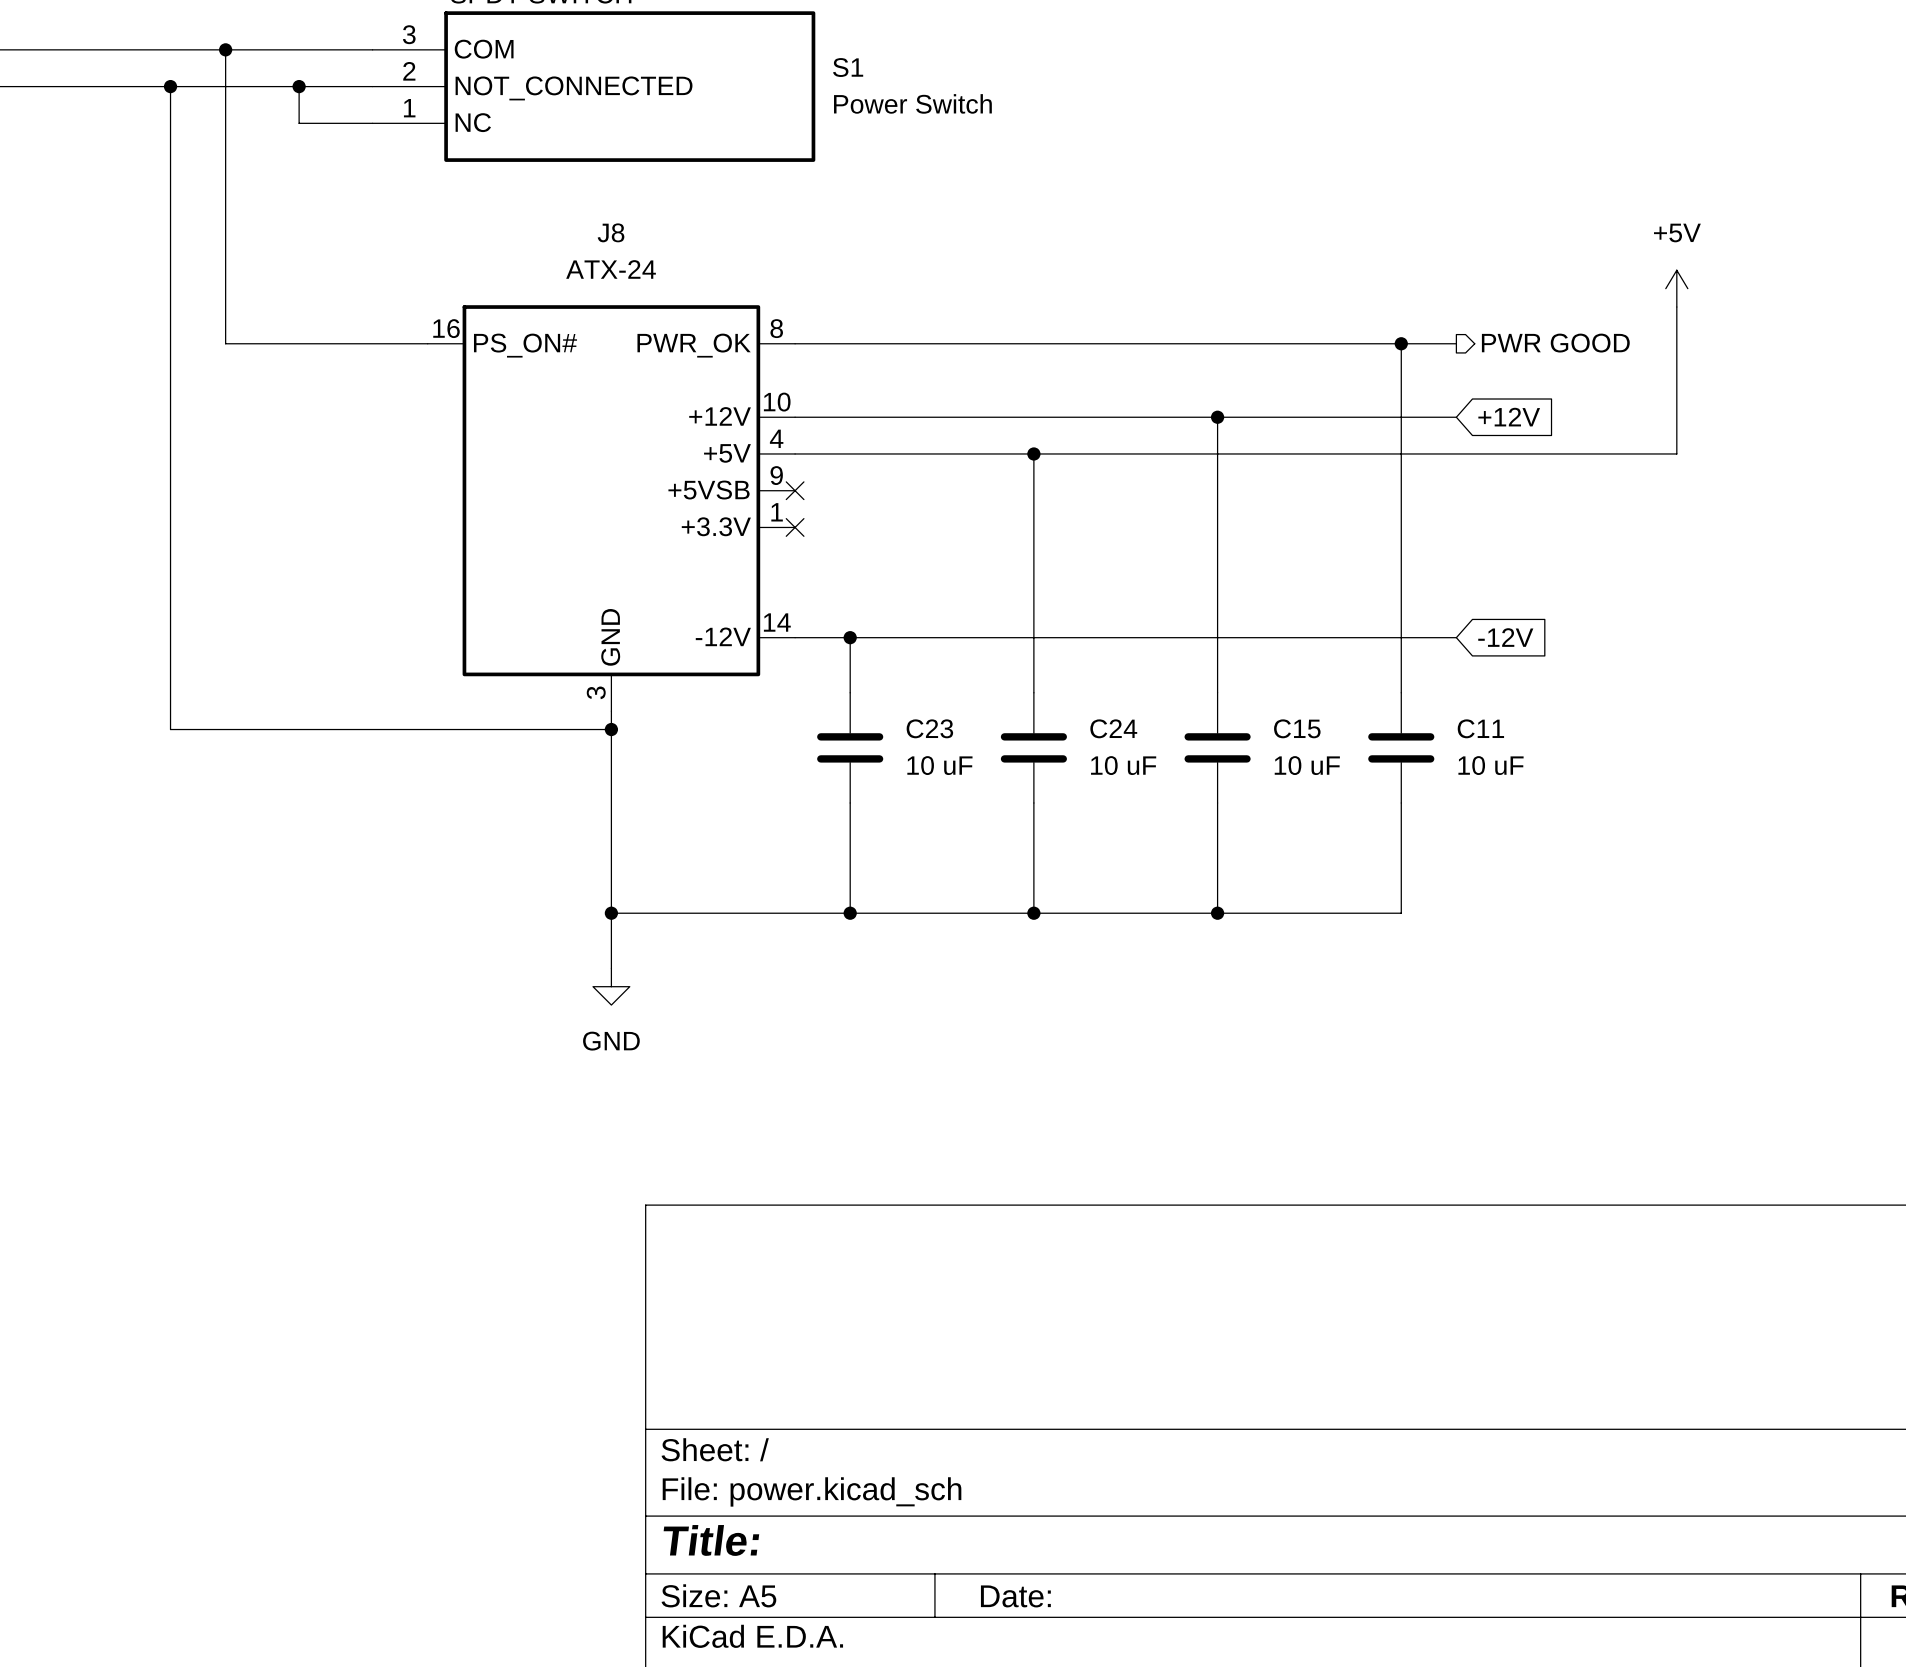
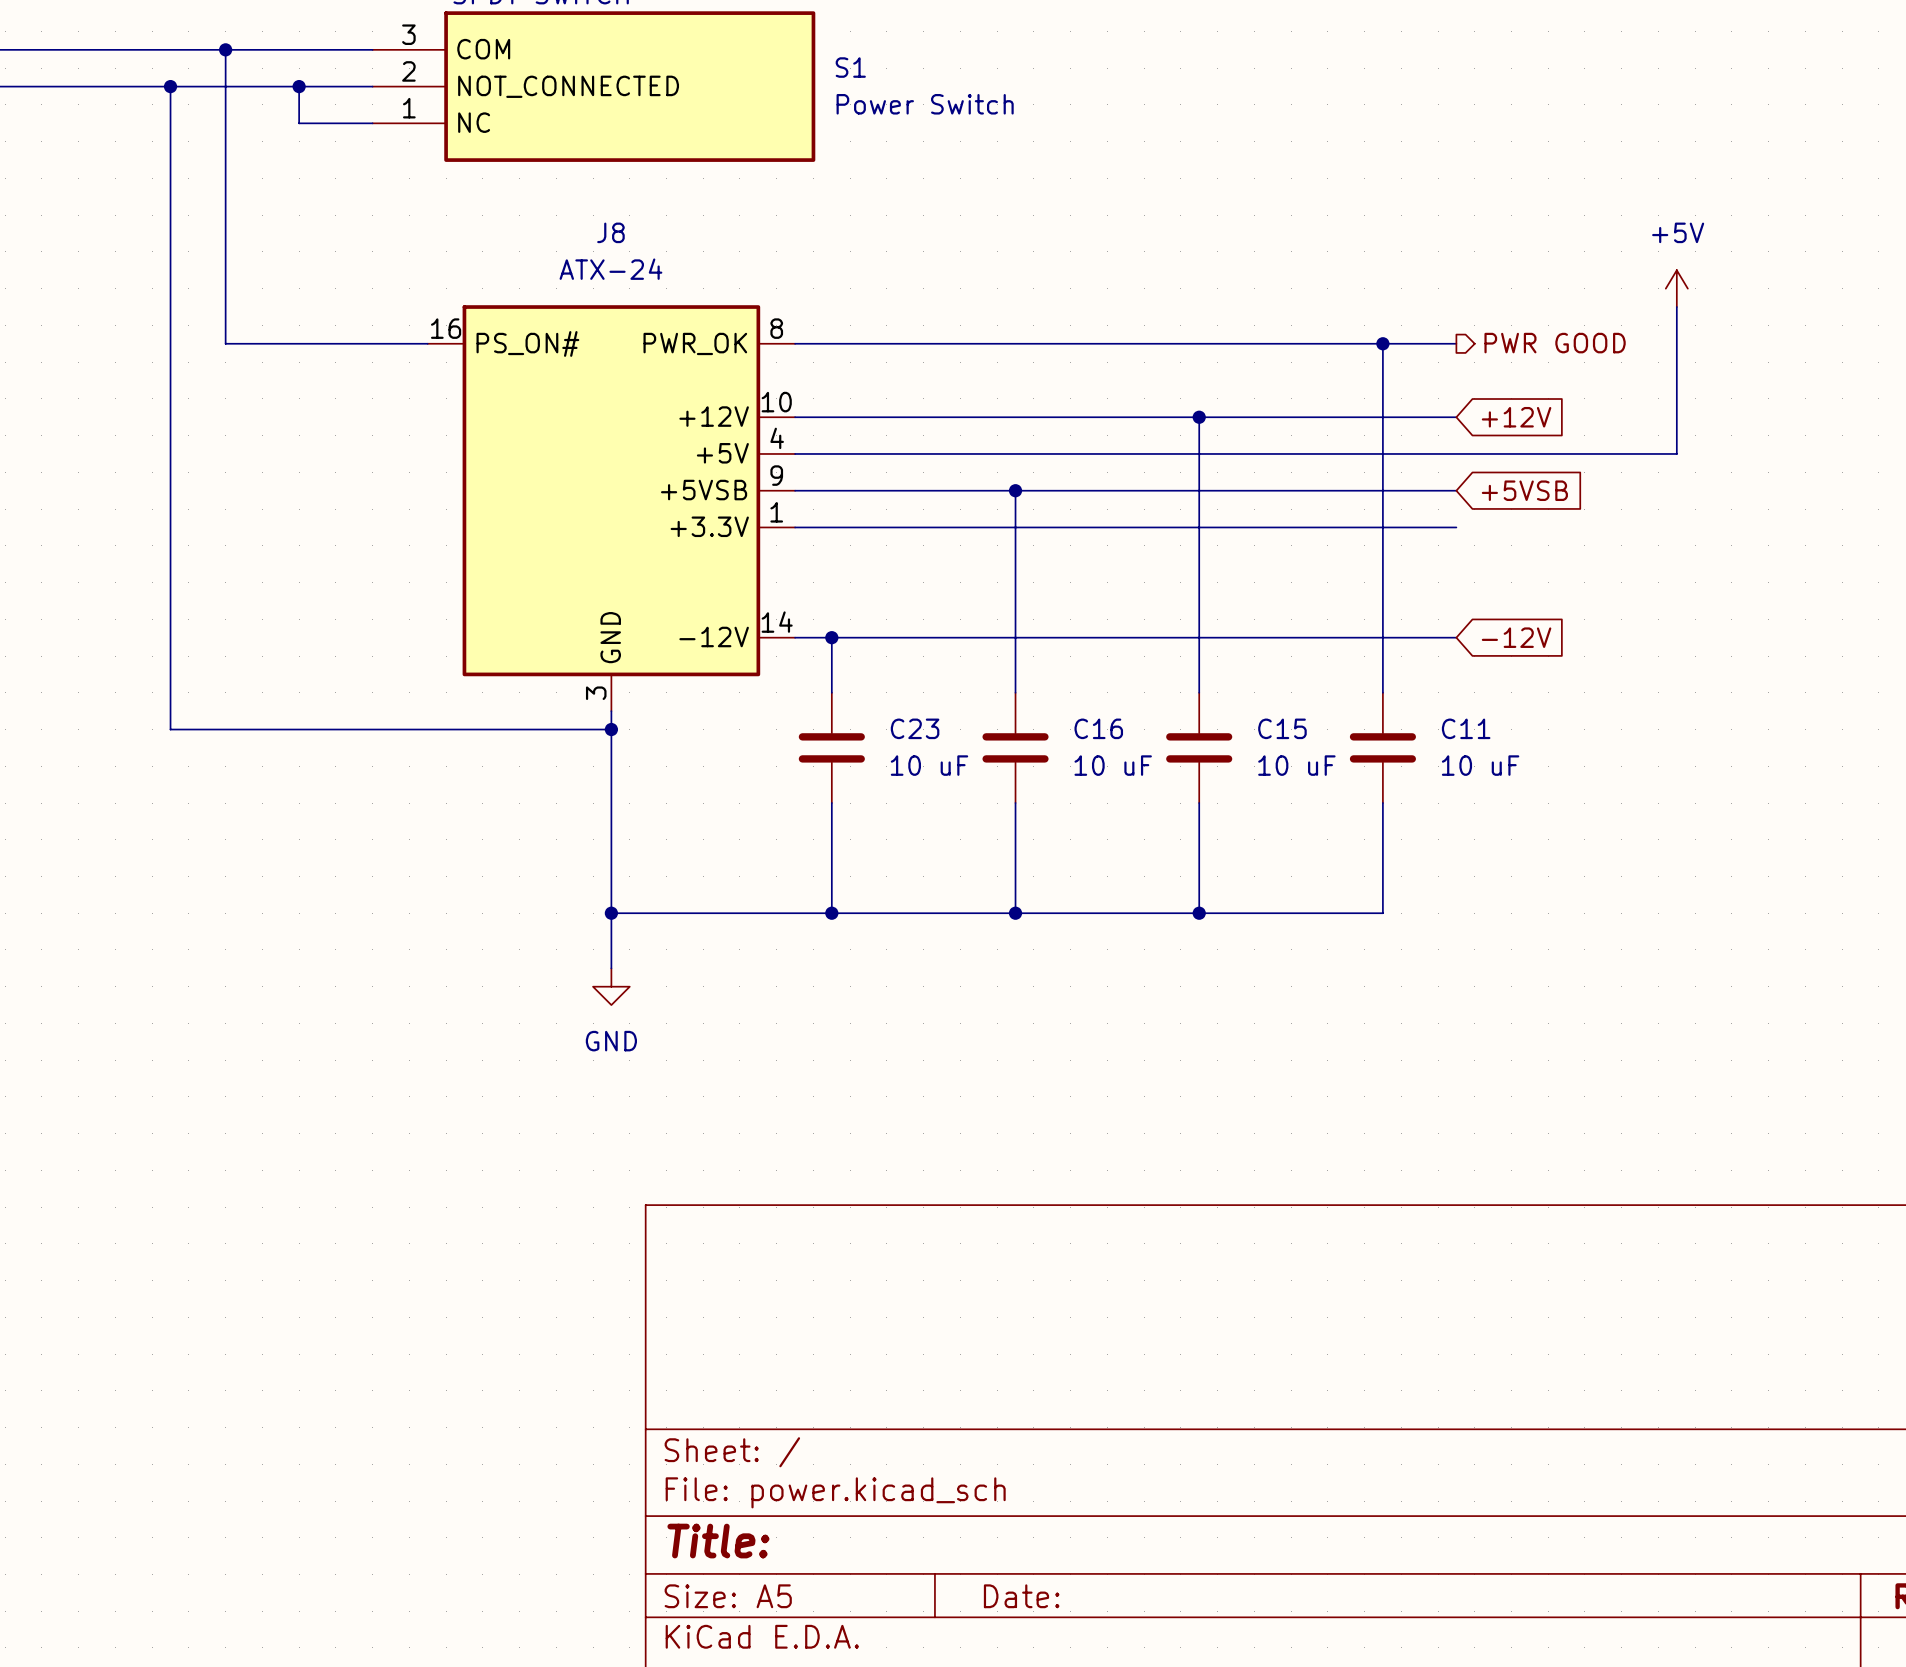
wire: (1401, 343) (1401, 692) -> (1382, 343) (1382, 692)
junction position: (1401, 343) -> (1382, 343)
wire: (1217, 417) (1217, 692) -> (1199, 417) (1199, 692)
junction position: (1217, 417) -> (1199, 417)
wire: (1033, 453) (1033, 692) -> none
junction position: (1033, 453) -> (1015, 490)
wire: none -> (795, 490) (1456, 490)
no-connect mark: (795, 490) -> none
wire: none -> (1015, 490) (1015, 692)
global label: none -> +5VSB (1524, 490)
wire: none -> (795, 527) (1456, 527)
no-connect mark: (795, 527) -> none
wire: (850, 637) (850, 692) -> (831, 637) (831, 692)
junction position: (850, 637) -> (831, 637)
C23 position: (850, 747) -> (831, 747)
C16: none -> 10 uF (1015, 747)
C24: 10 uF (1033, 747) -> none
C15 position: (1217, 747) -> (1199, 747)
C11 position: (1401, 747) -> (1382, 747)
wire: (850, 803) (850, 913) -> (831, 803) (831, 913)
wire: (1033, 803) (1033, 913) -> (1015, 803) (1015, 913)
wire: (1217, 803) (1217, 913) -> (1199, 803) (1199, 913)
wire: (1401, 803) (1401, 913) (1382, 913) -> (1382, 803) (1382, 913)
junction position: (850, 913) -> (831, 913)
junction position: (1033, 913) -> (1015, 913)
junction position: (1217, 913) -> (1199, 913)

